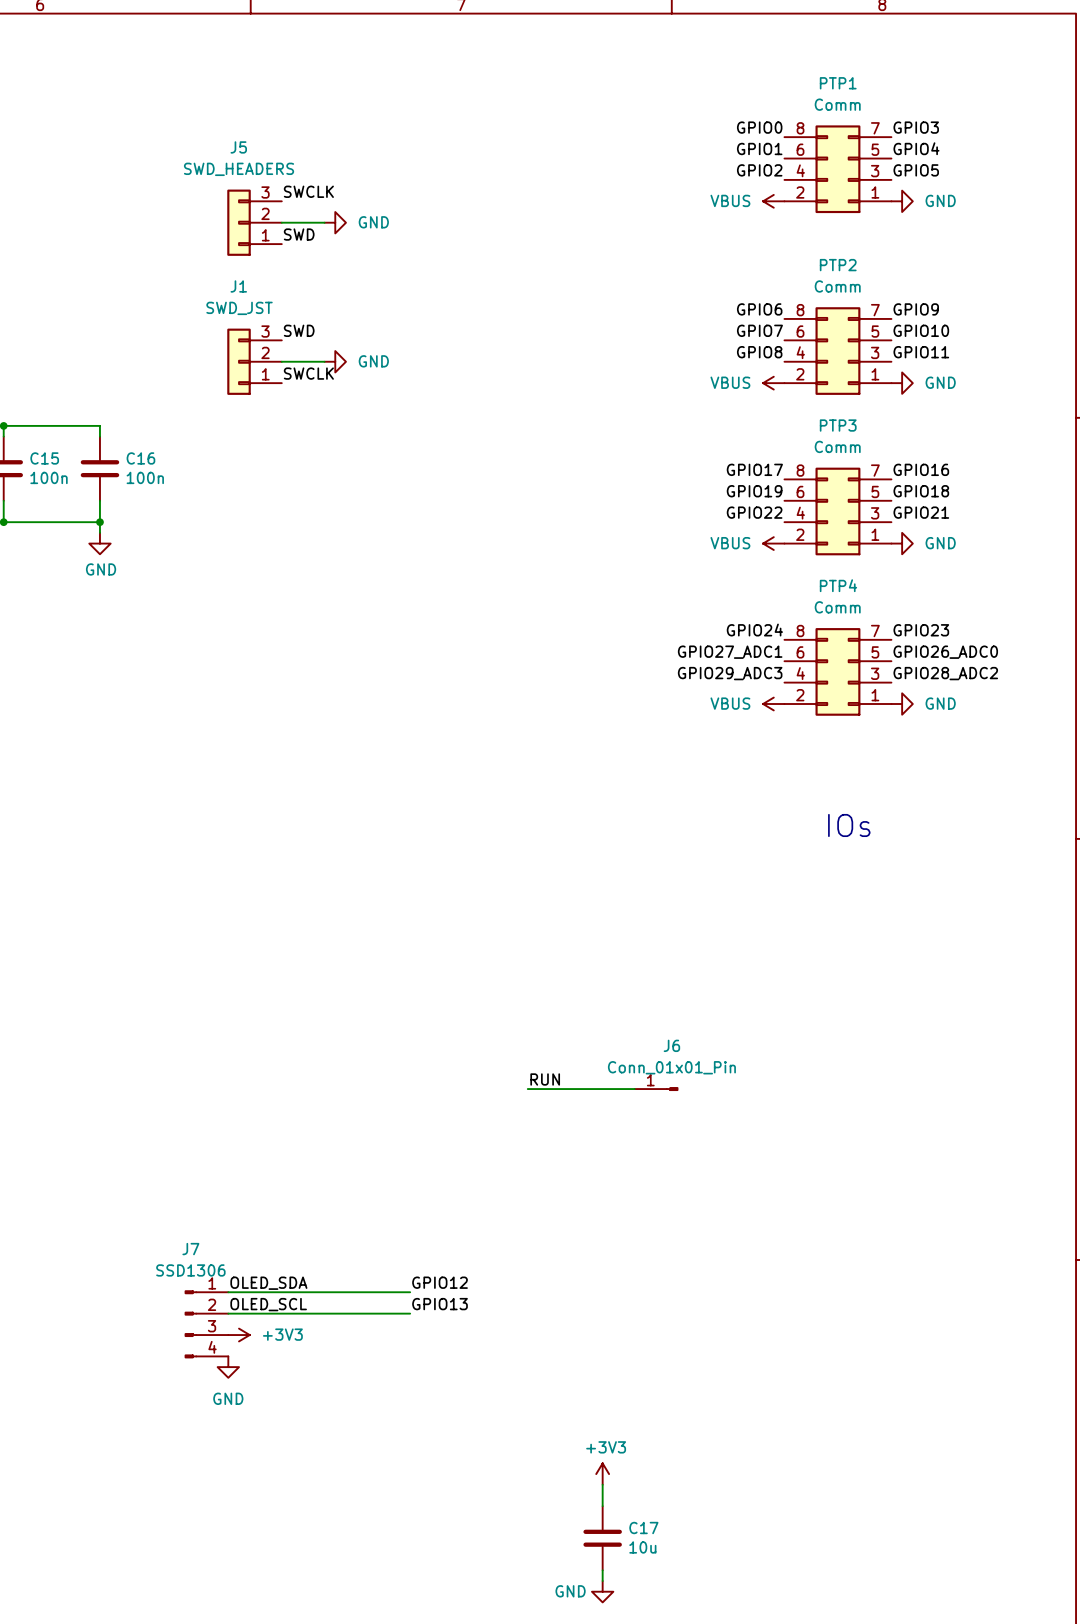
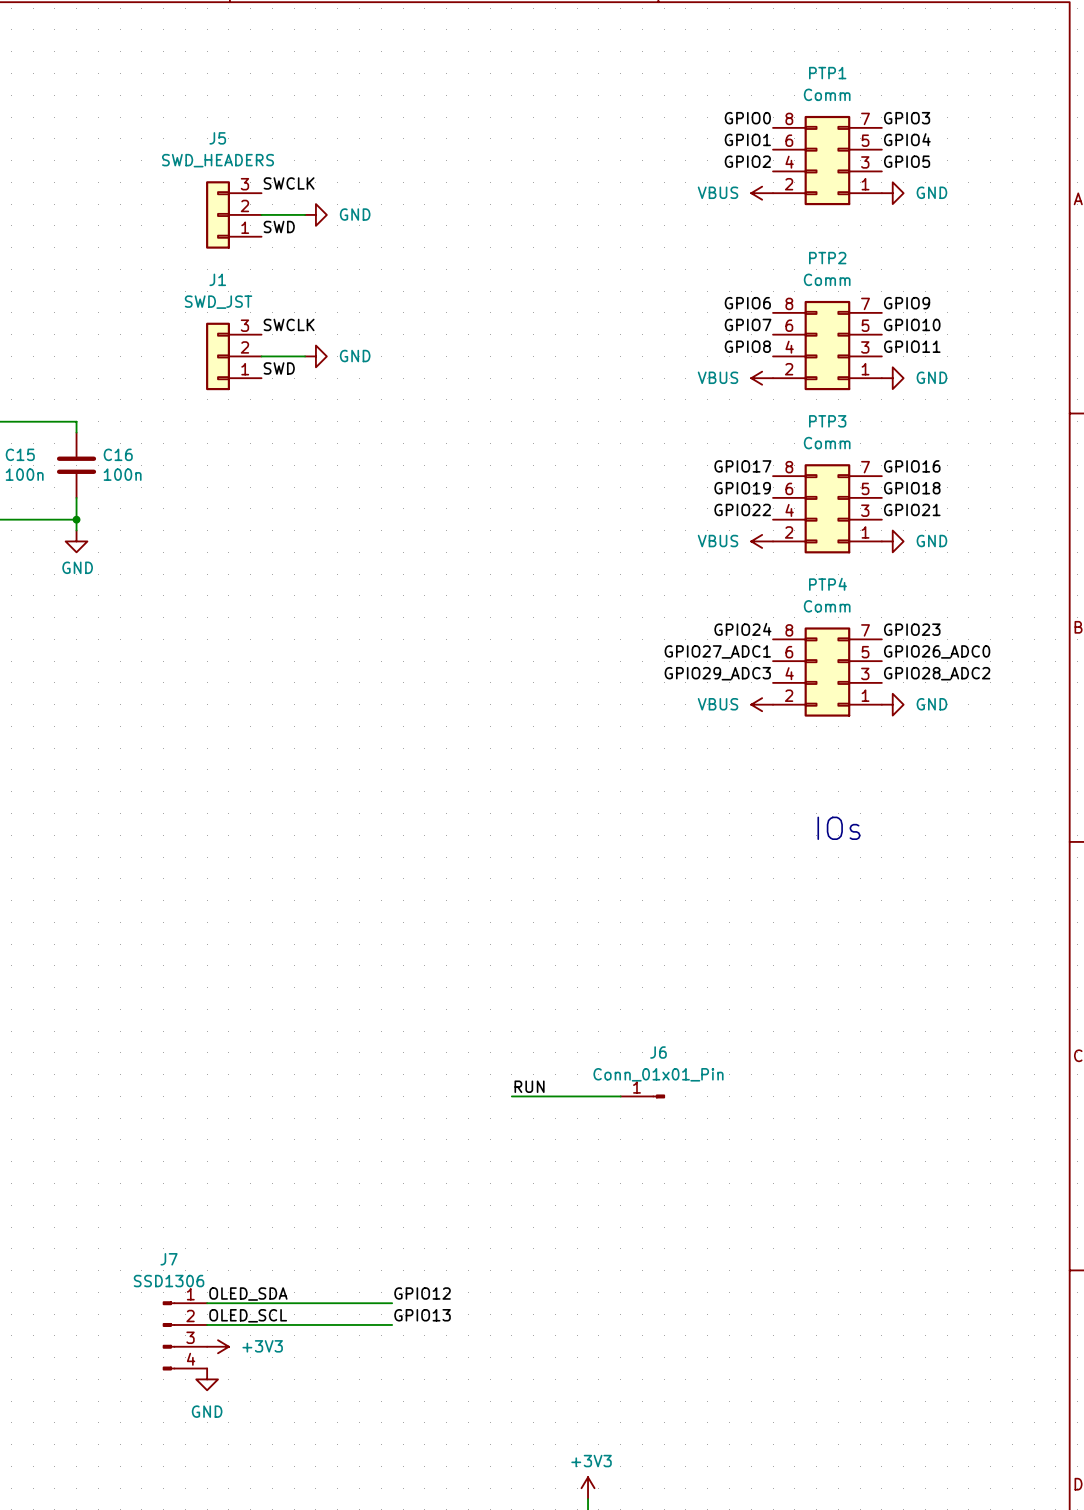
label: SWD (299, 330) -> SWCLK (289, 324)
label: SWCLK (308, 373) -> SWD (279, 368)

